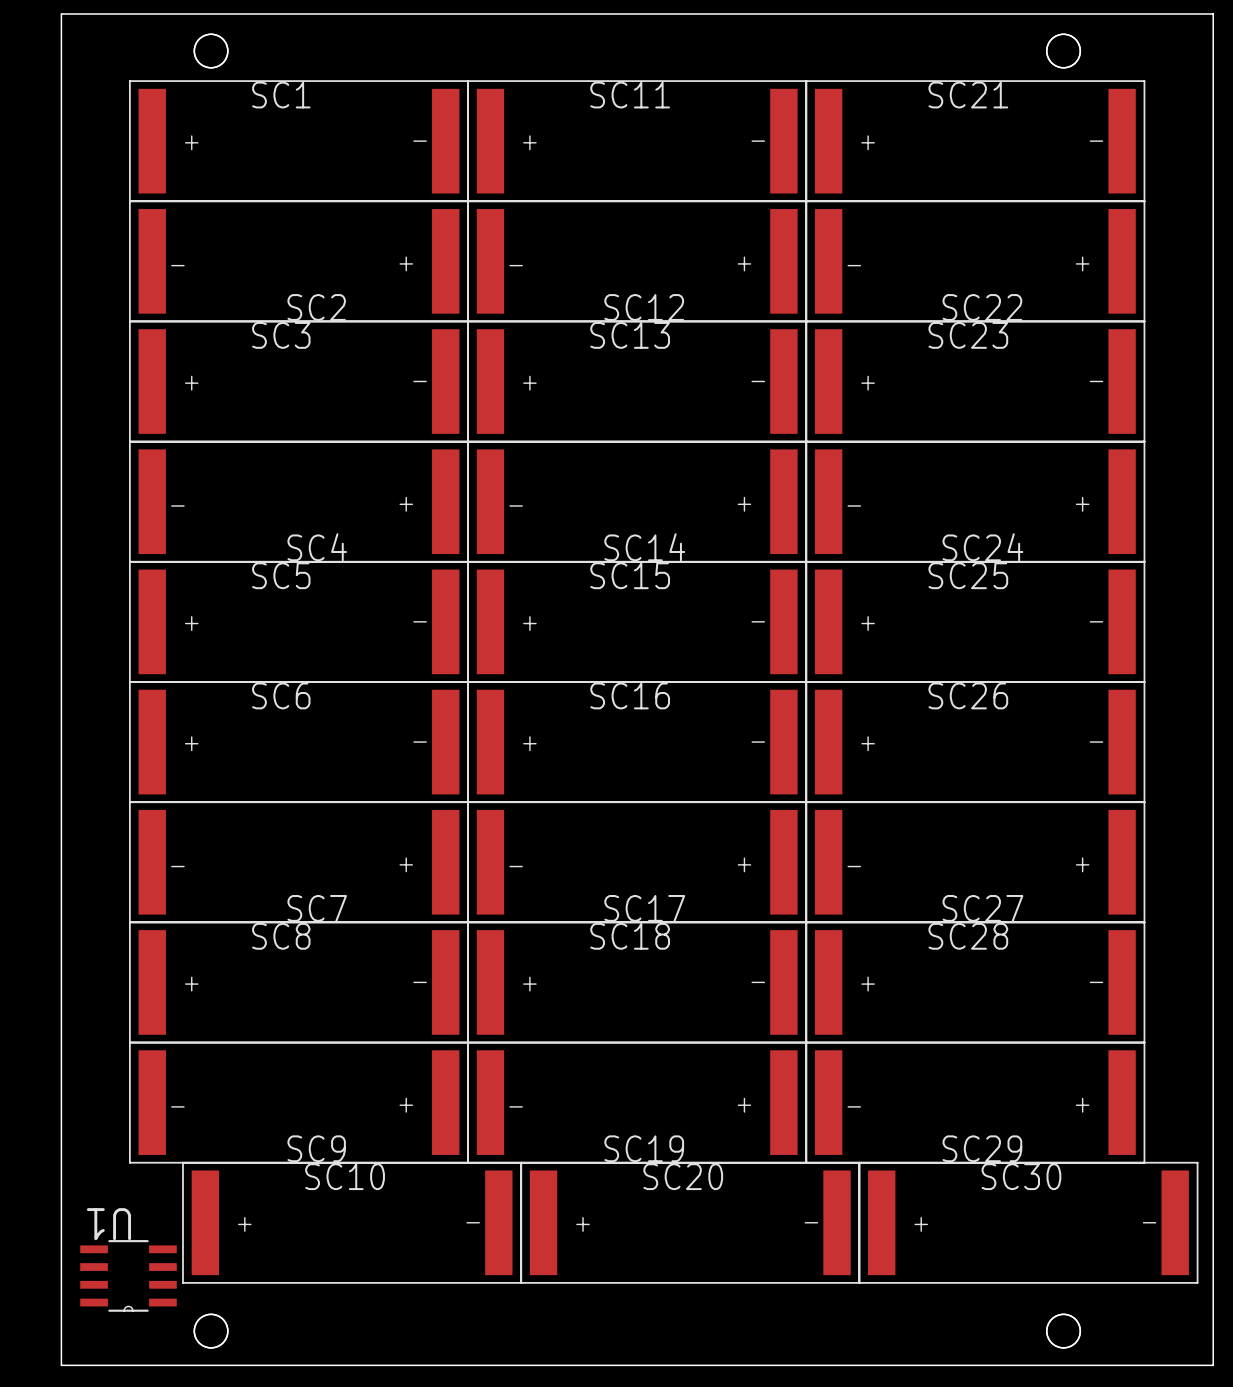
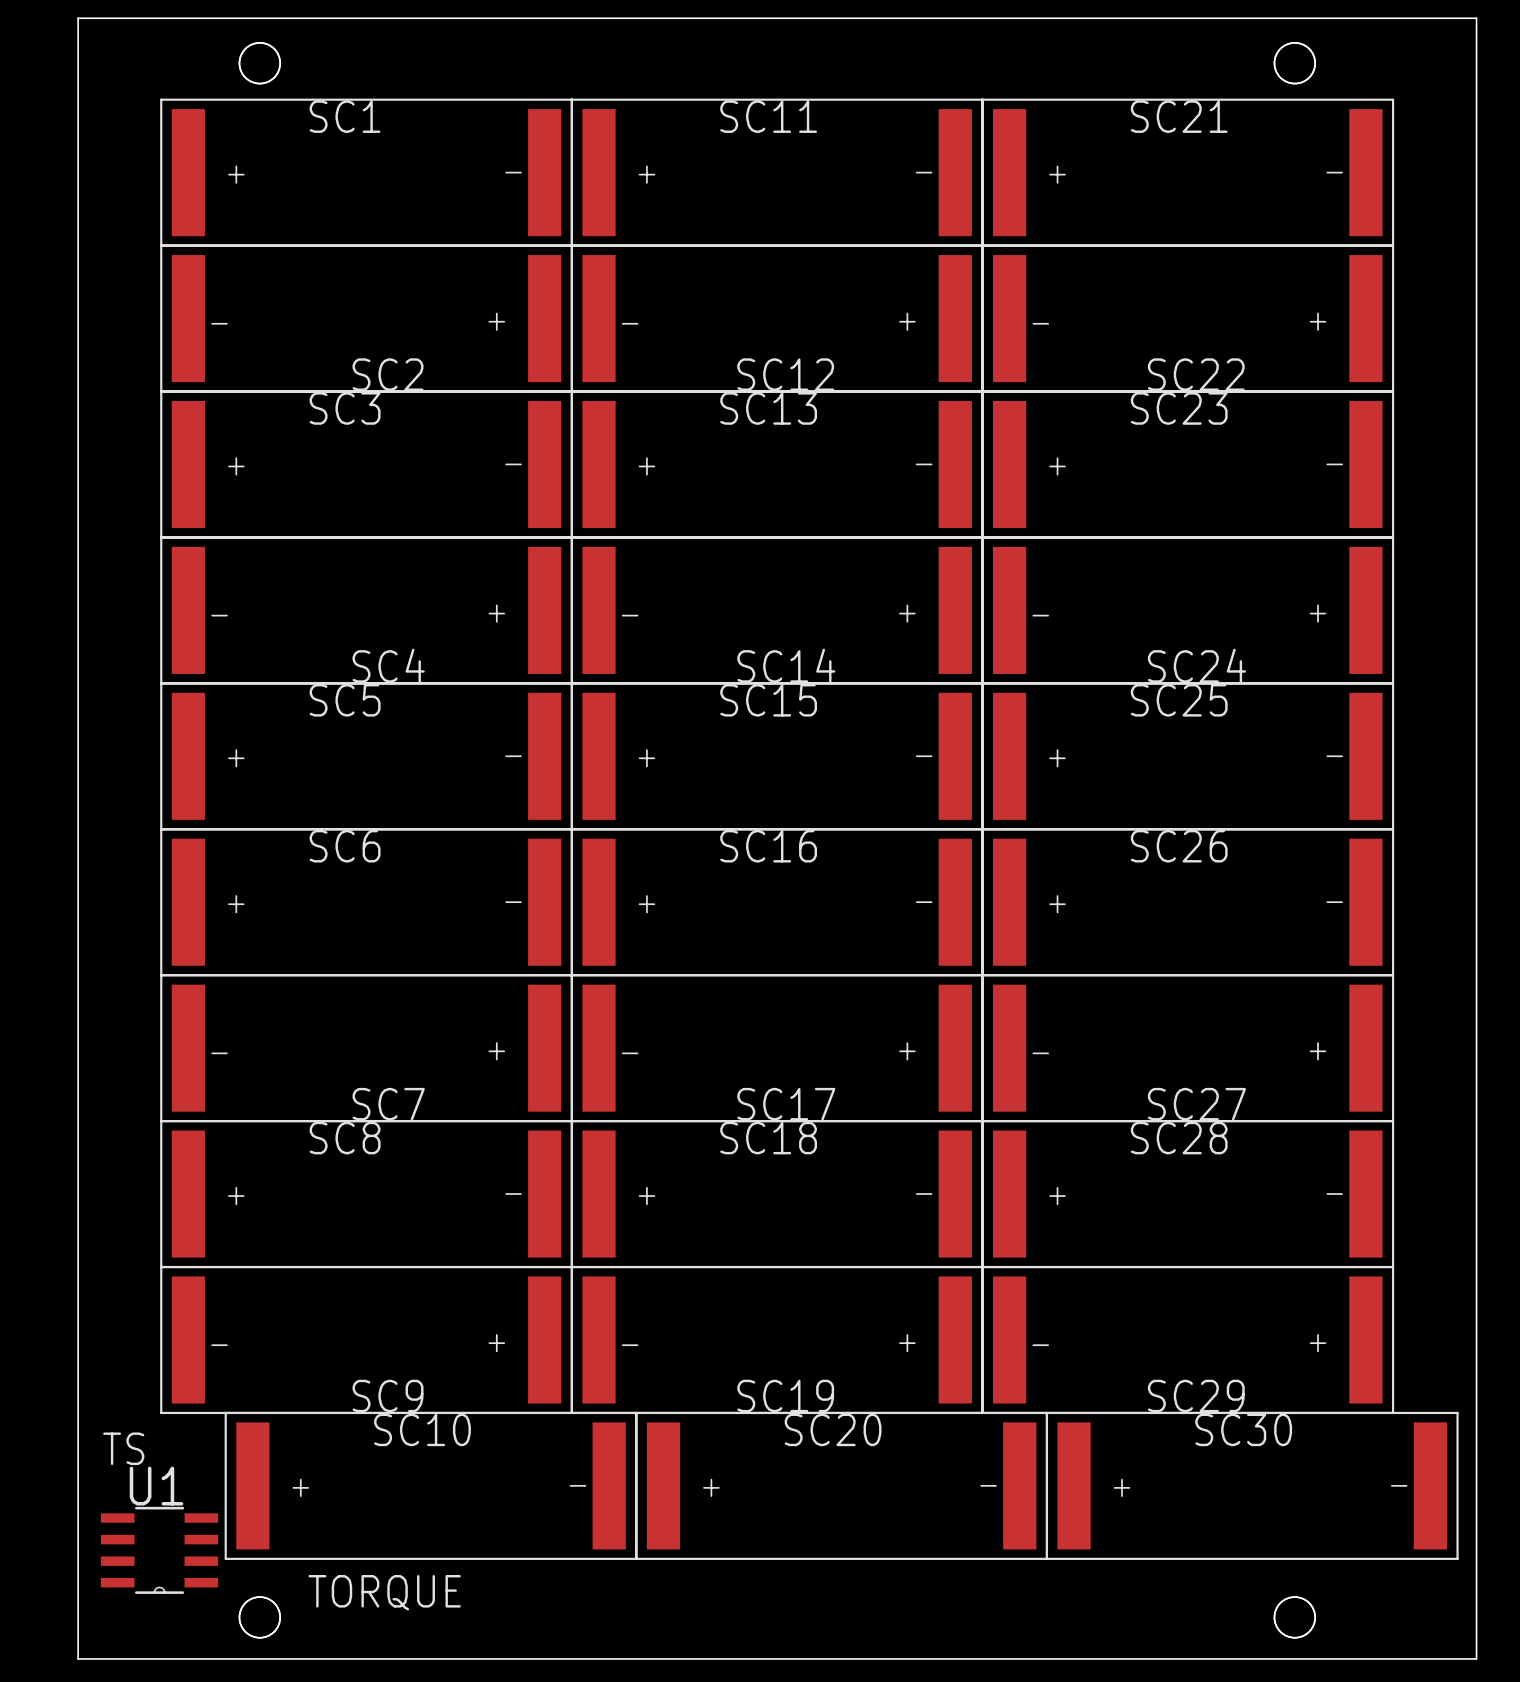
text: none -> TS (123, 1448)
U1 name rotation: 0° (108, 1224) -> 180° (156, 1486)
text: none -> TORQUE (384, 1592)

